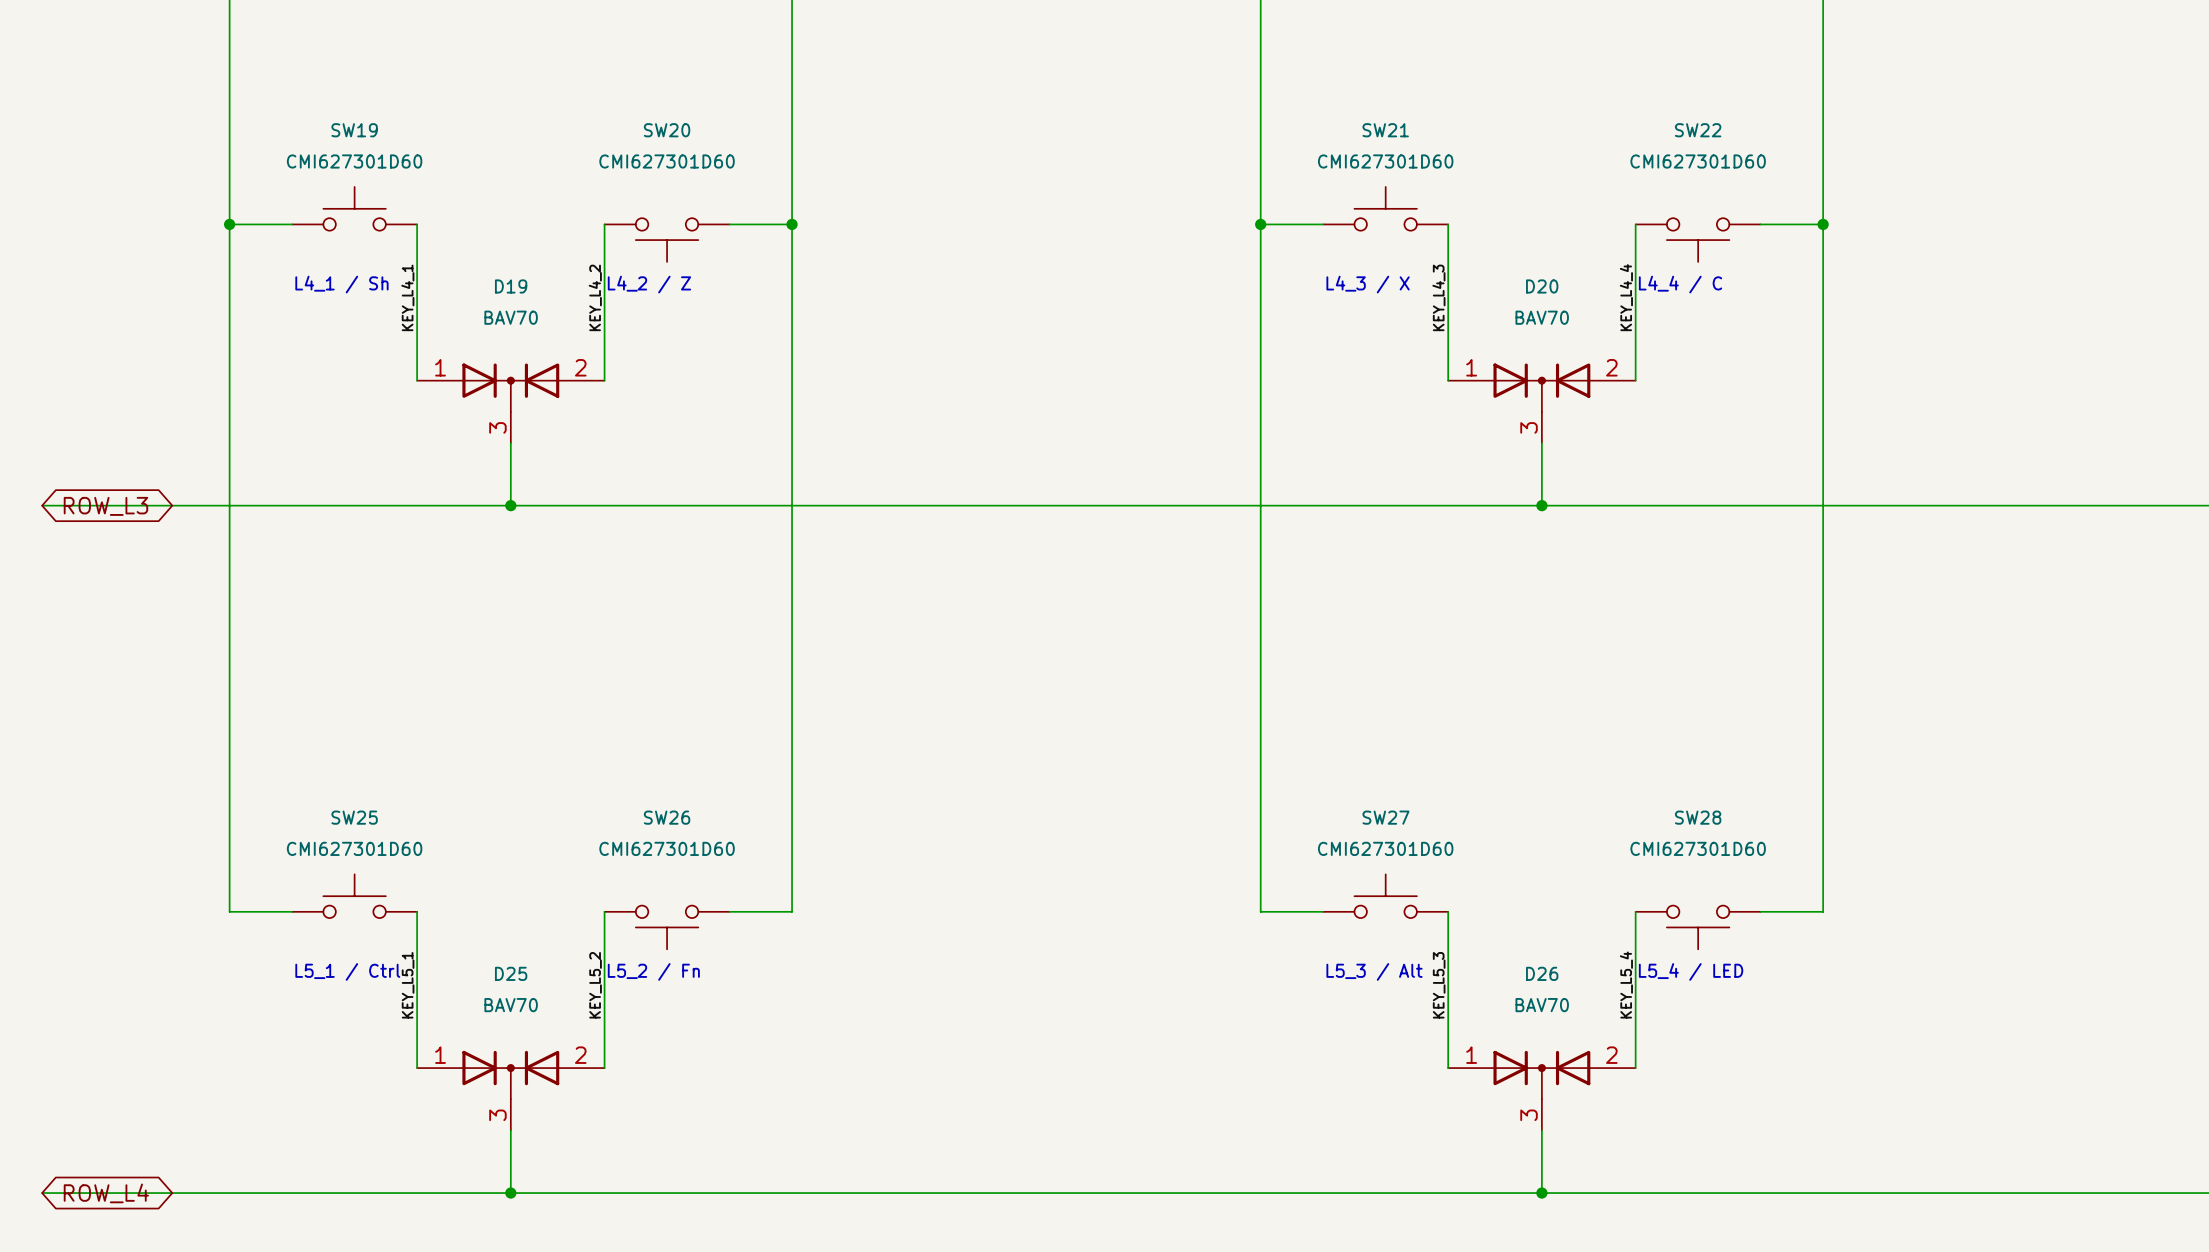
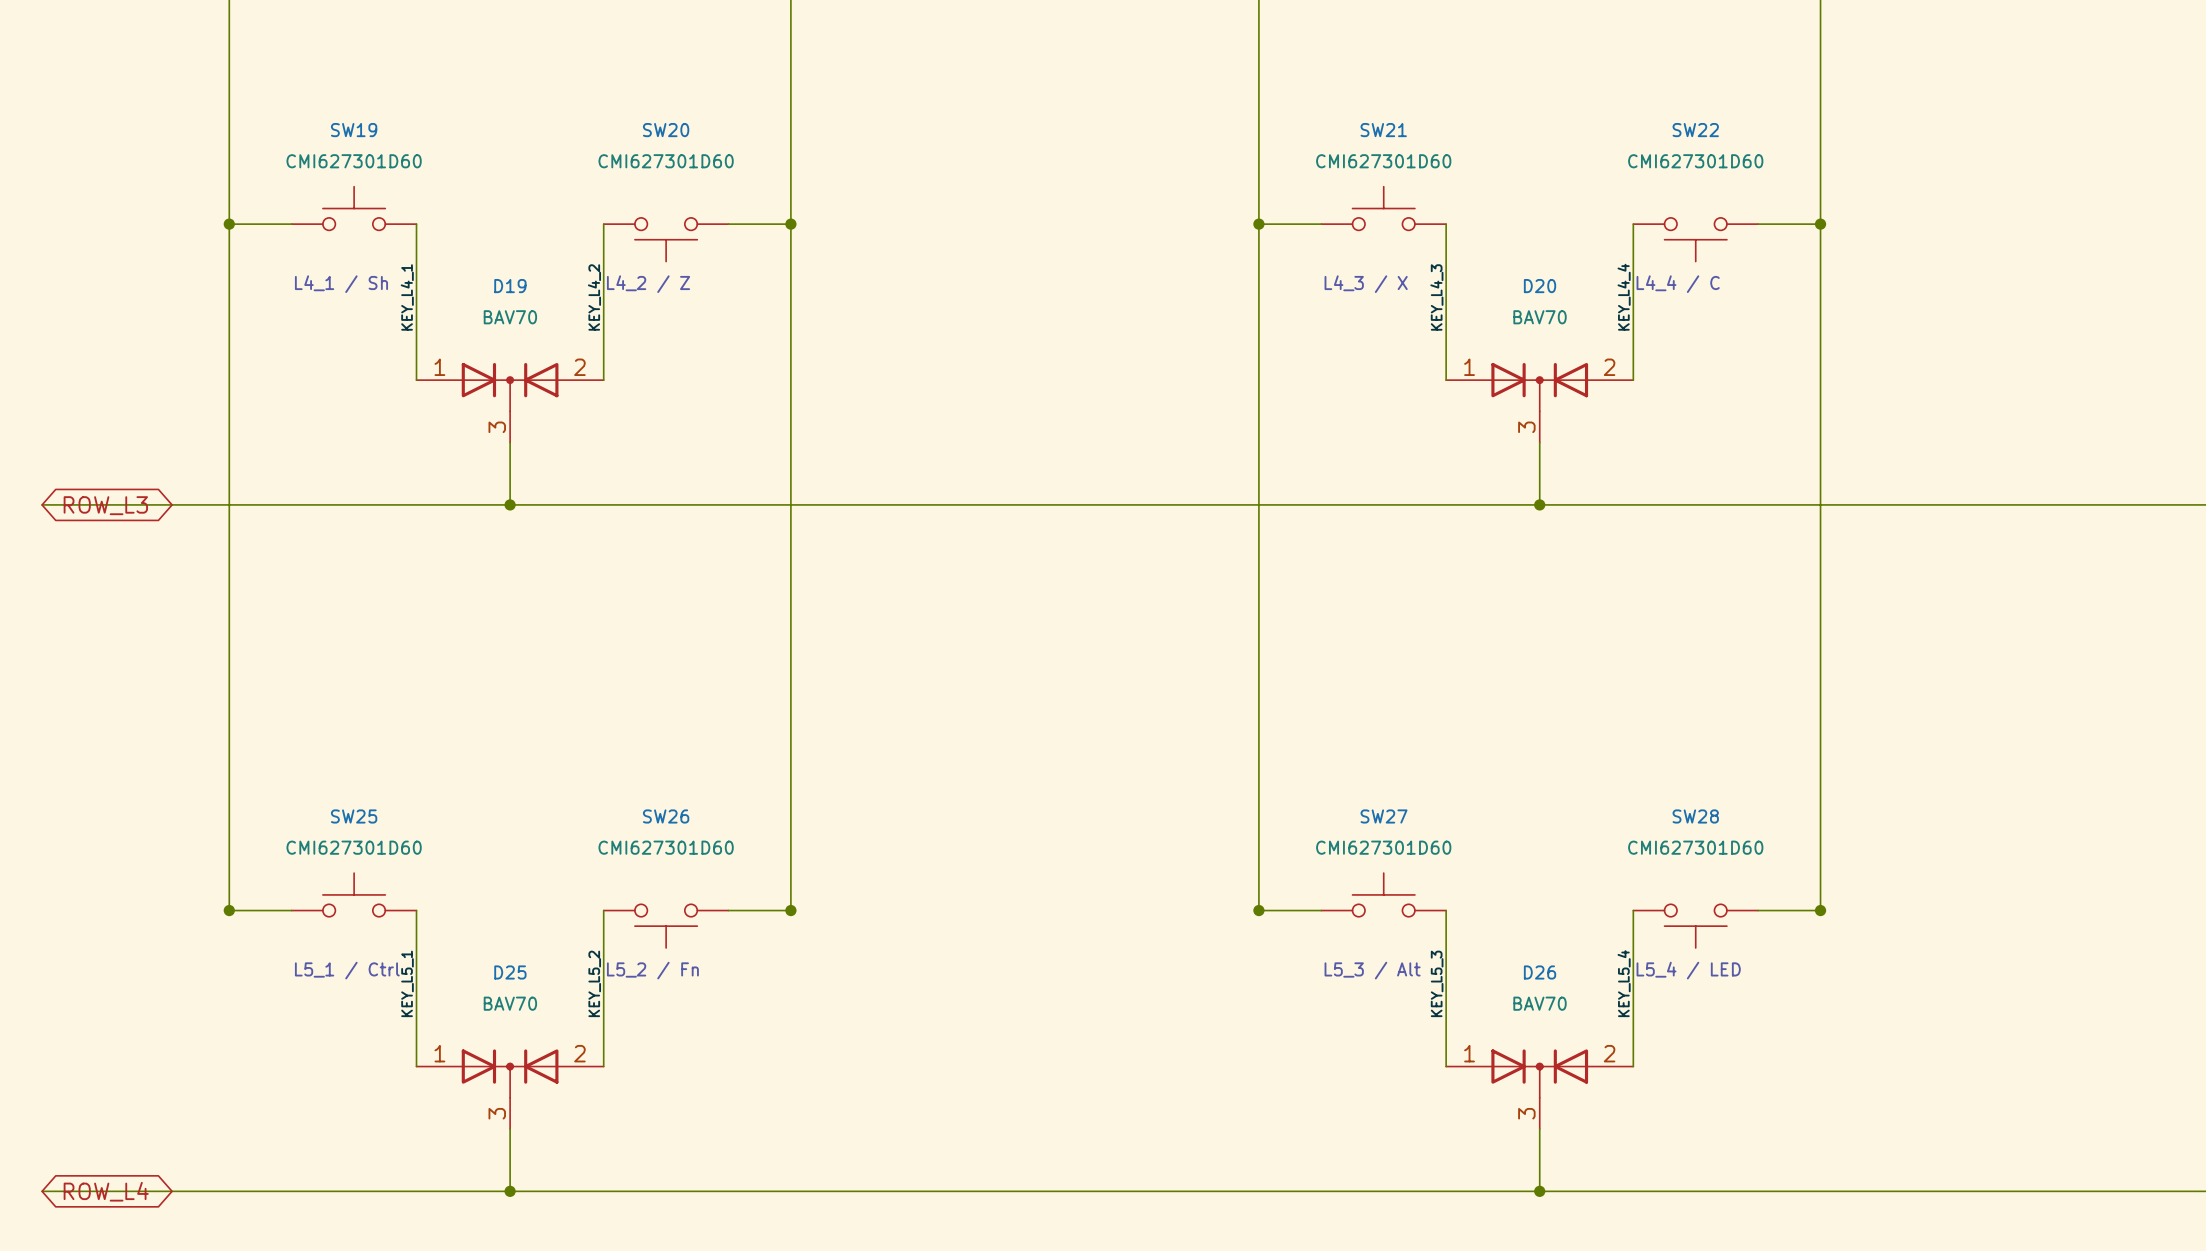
junction: none -> (229, 910)
junction: none -> (790, 910)
junction: none -> (1258, 910)
junction: none -> (1820, 910)

